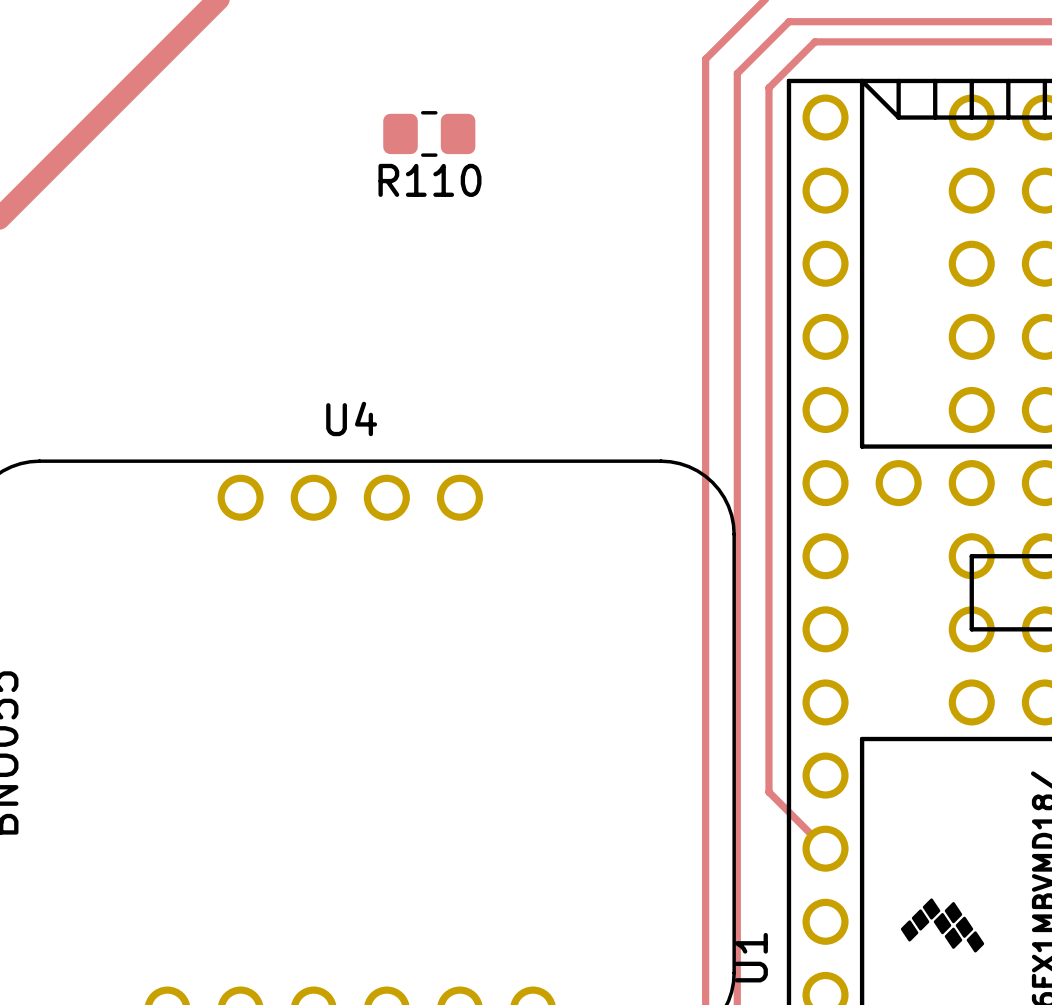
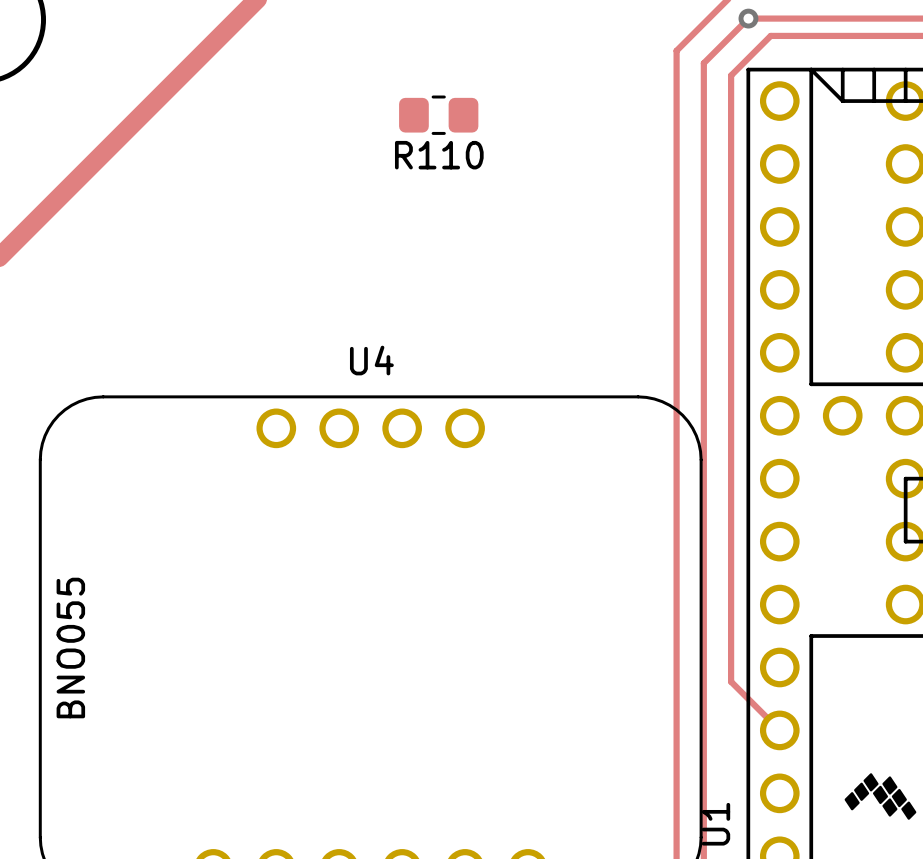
via: none -> (748, 18)

